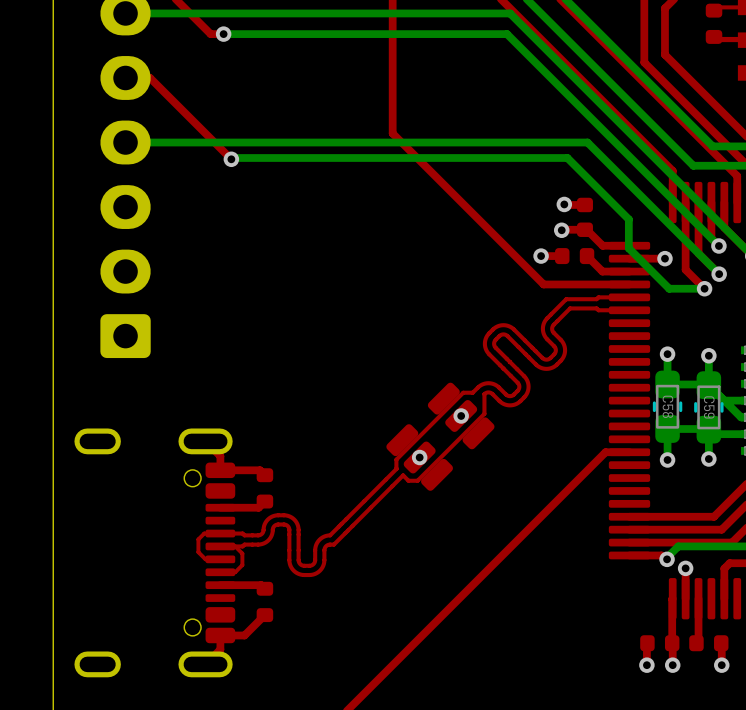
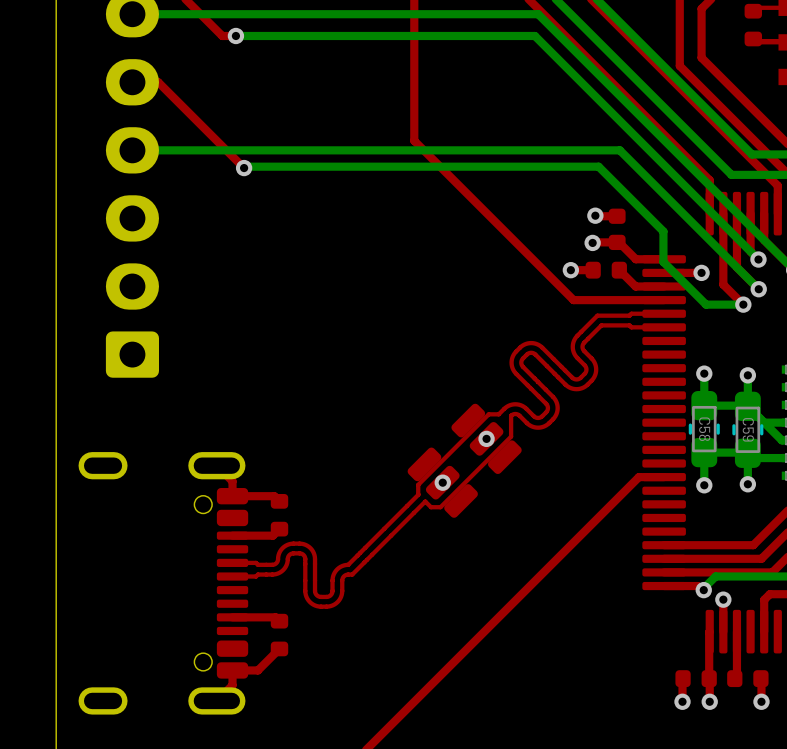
top track: (220, 533) (204, 533) (198, 539) (198, 552) (205, 559) (220, 559) -> none
top track: (220, 546) (235, 546) (242, 553) (242, 565) (235, 572) (220, 572) -> none

